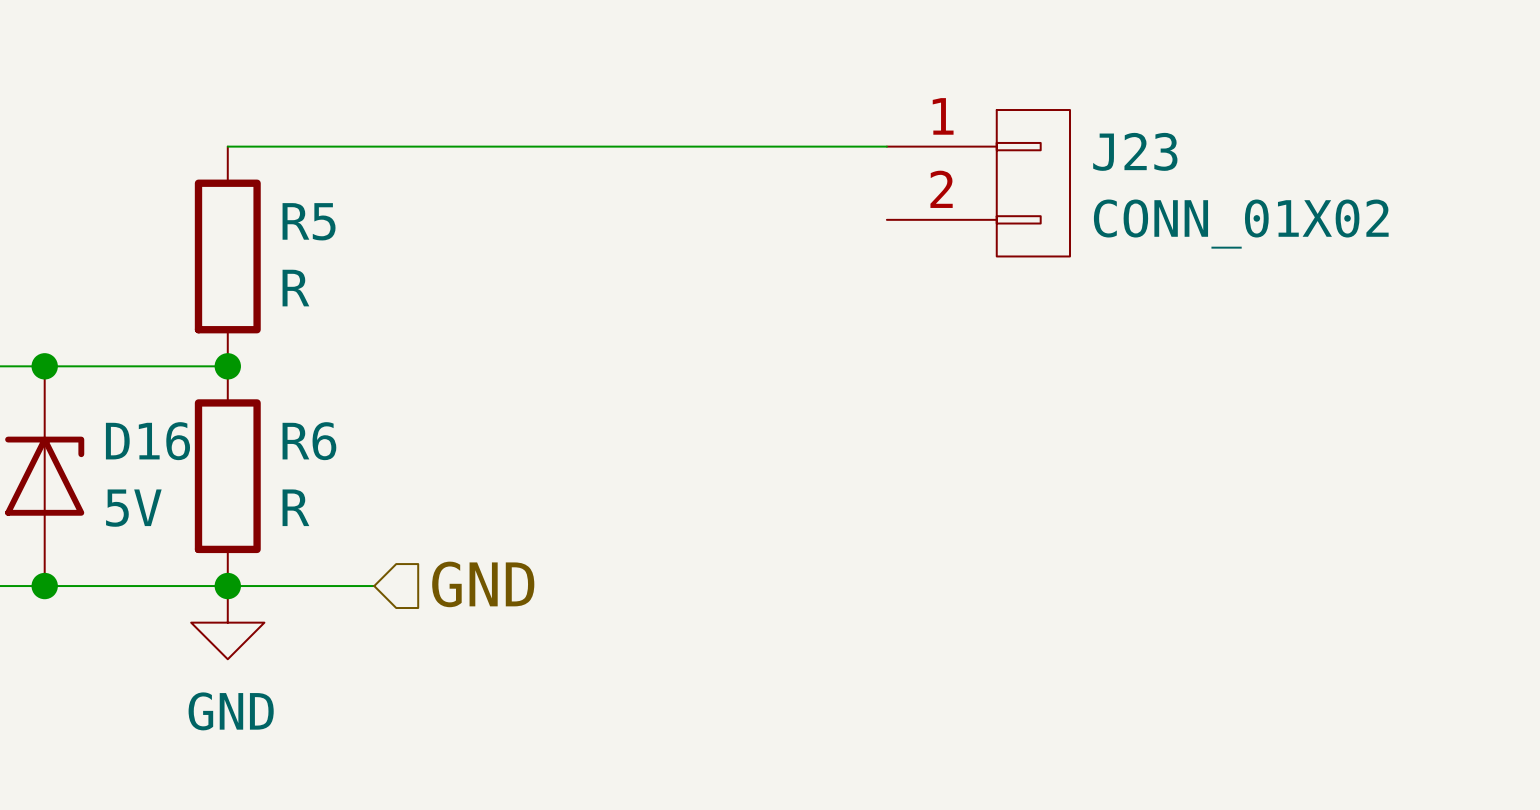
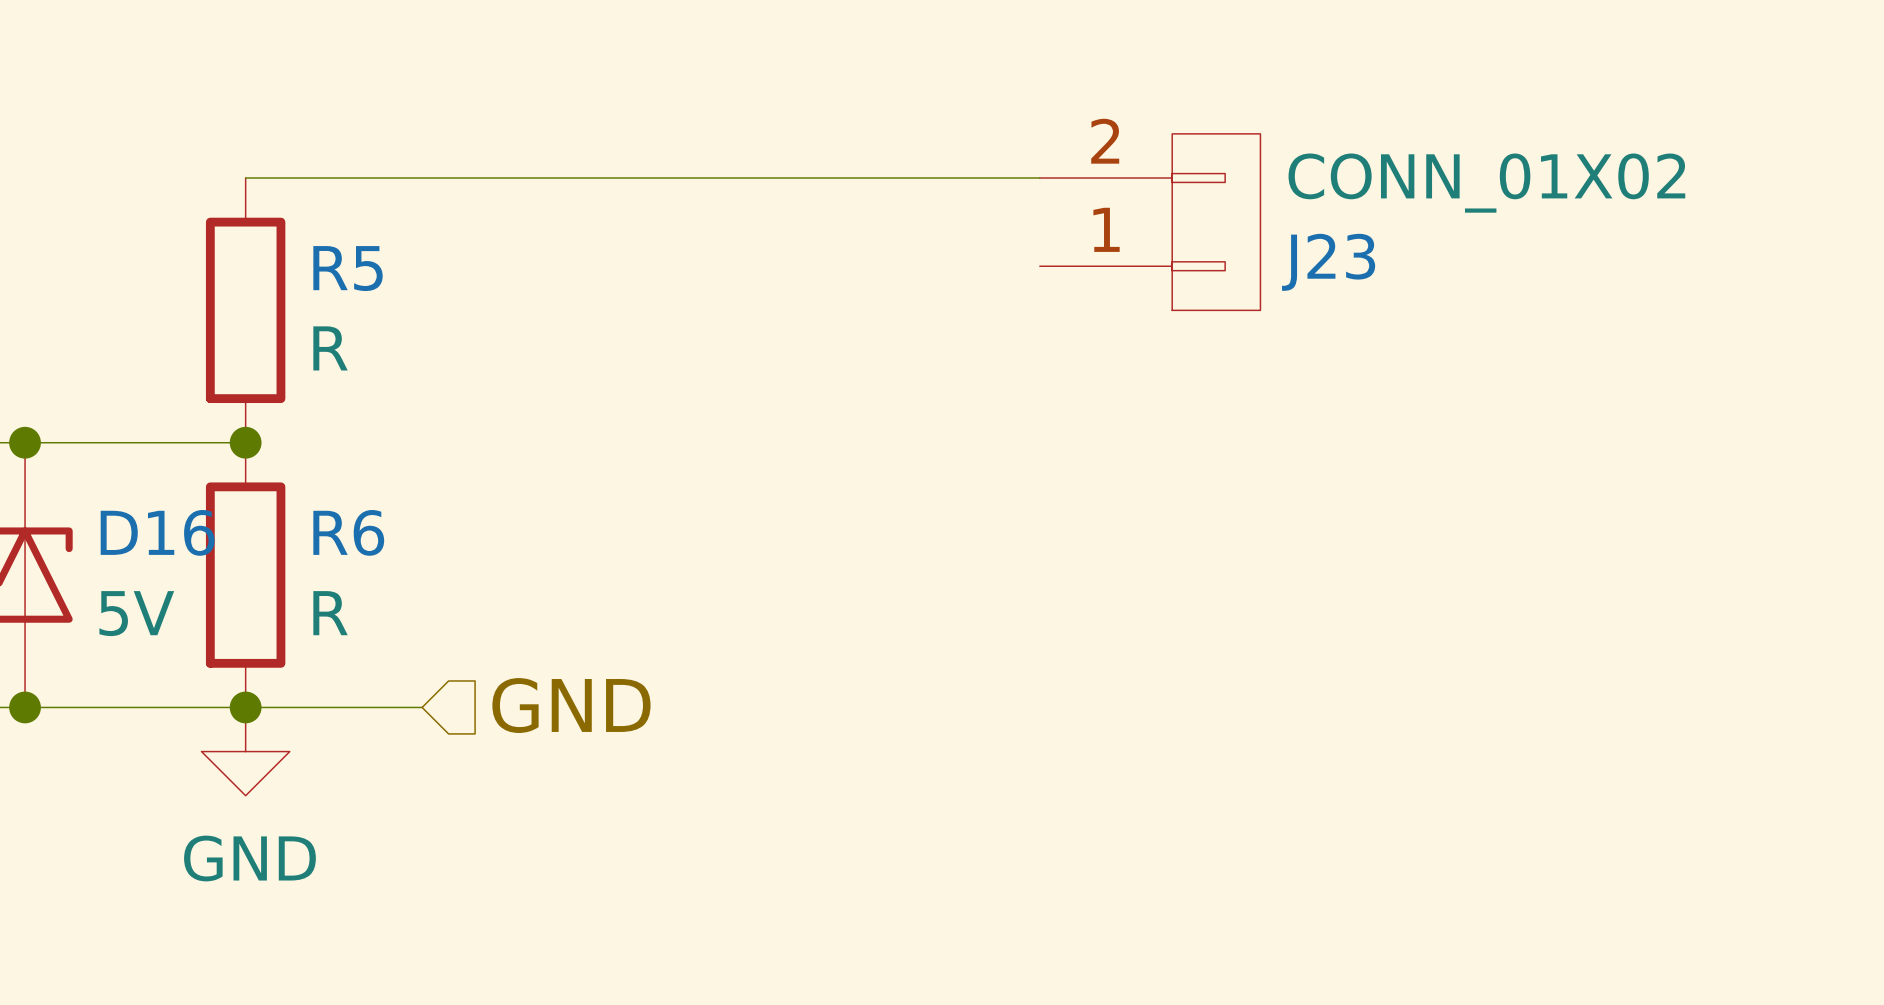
J23 flip: as is (1033, 183) -> up-down (1216, 222)

